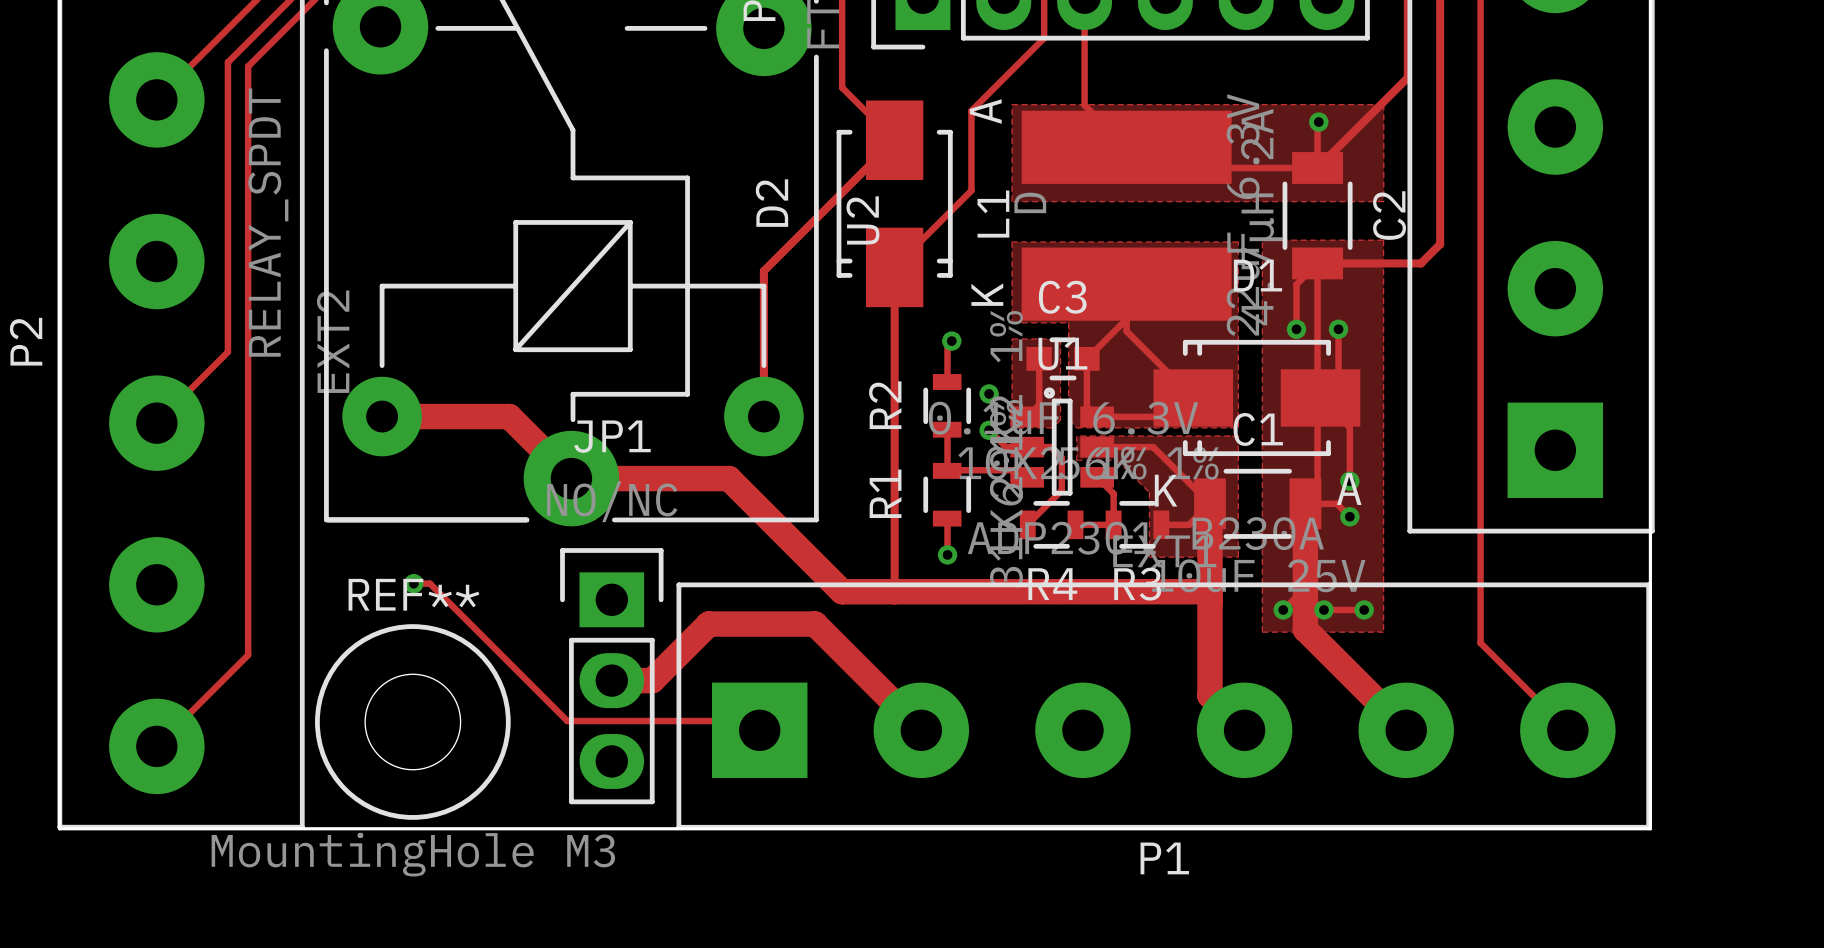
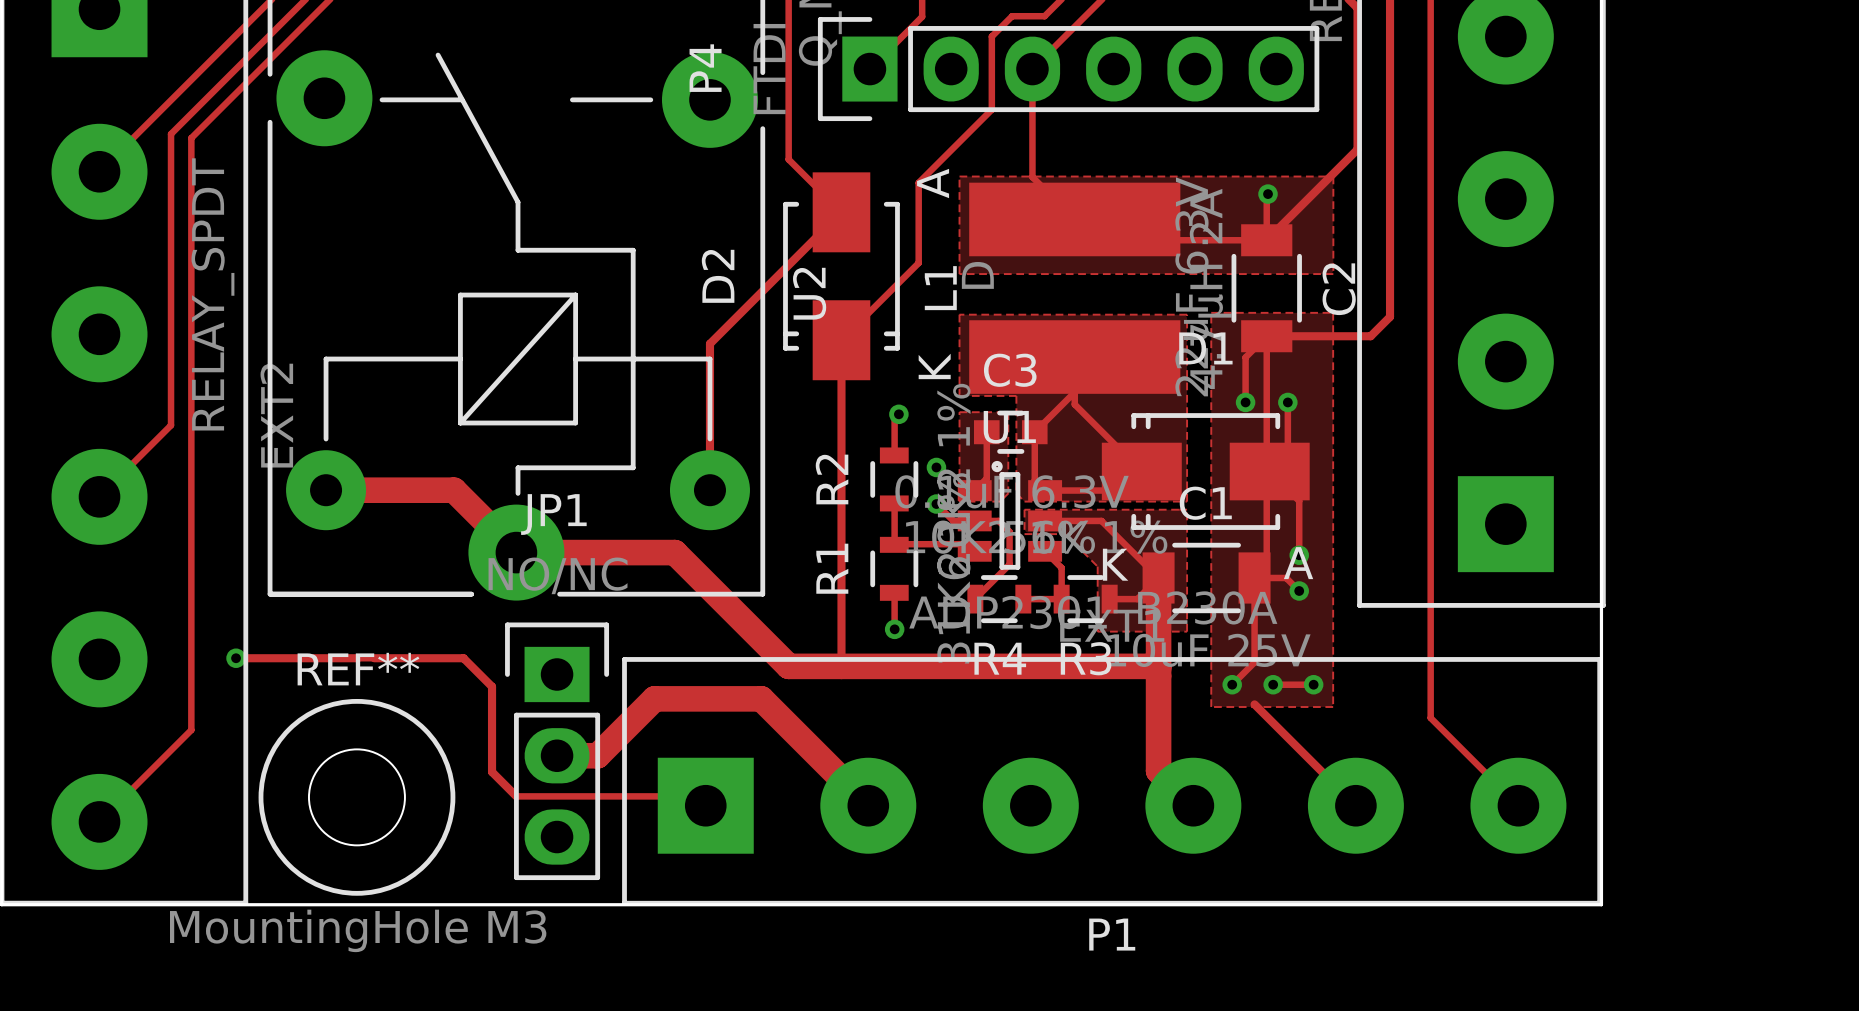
track: (1305, 503) (1305, 629) -> none
track: none -> (236, 658) (357, 658)
via position: (413, 583) -> (236, 658)
track: (429, 583) (567, 721) (571, 721) -> (374, 658) (463, 658) (492, 686) (492, 772) (516, 796)
track width: thick (1305, 629) (1406, 730) -> thin (1254, 704) (1355, 805)

